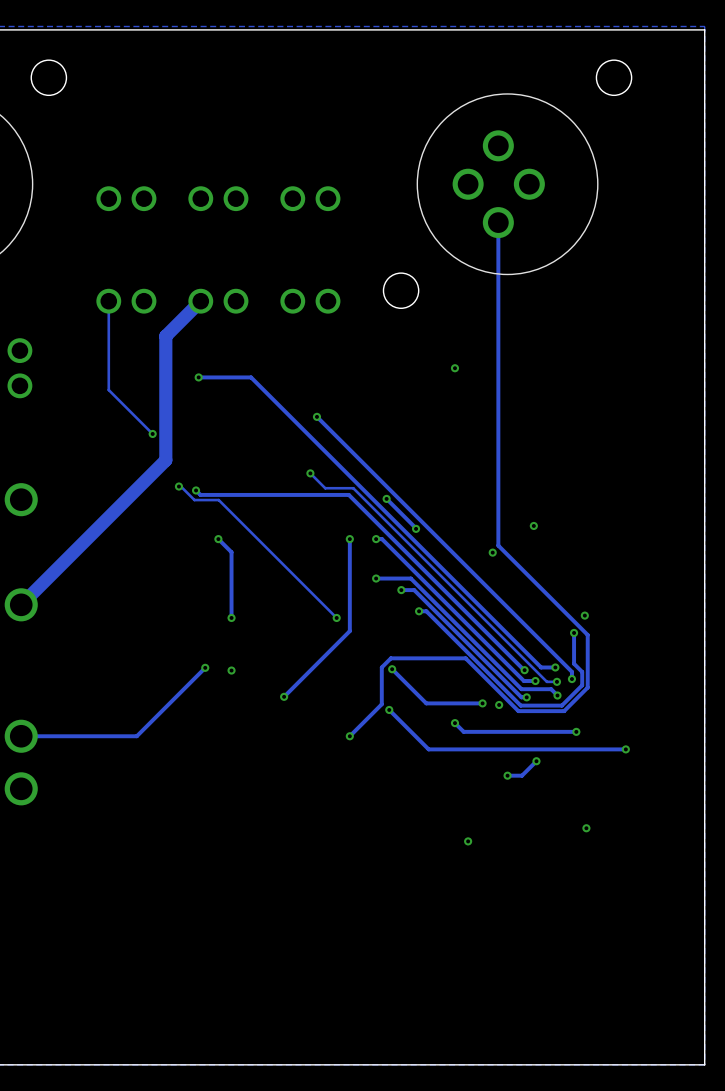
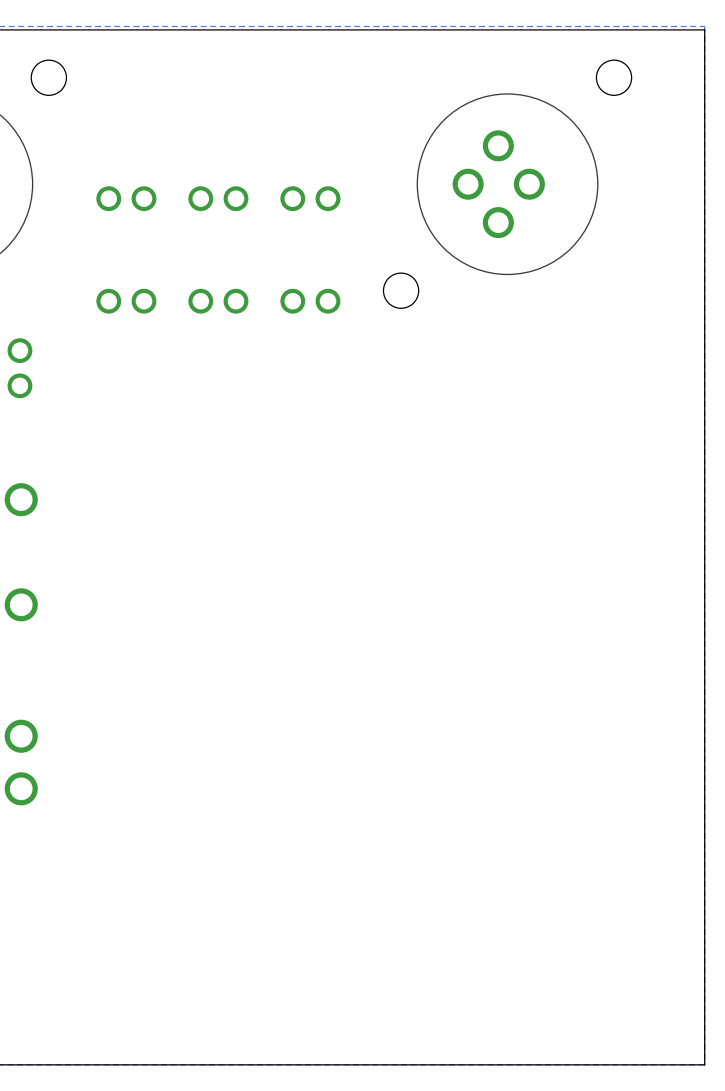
track: (498, 222) (498, 545) (587, 635) (587, 687) (564, 711) (518, 711) (465, 658) (390, 658) (381, 667) (381, 704) (349, 736) -> none
track: (108, 301) (108, 390) (152, 433) -> none
track: (200, 301) (165, 336) (165, 460) (21, 604) -> none
via: (454, 368) -> none
track: (198, 377) (251, 377) (541, 667) (555, 667) -> none
via: (198, 377) -> none
track: (316, 416) (571, 671) (571, 679) -> none
via: (316, 416) -> none
via: (152, 433) -> none
track: (310, 473) (325, 488) (353, 488) (546, 681) (556, 681) -> none
via: (310, 473) -> none
track: (178, 486) (194, 500) (218, 500) (336, 617) -> none
via: (178, 486) -> none
track: (196, 490) (200, 494) (348, 494) (524, 670) -> none
via: (196, 490) -> none
track: (386, 498) (416, 528) -> none
via: (386, 498) -> none
via: (533, 525) -> none
via: (416, 528) -> none
track: (218, 539) (231, 552) (231, 617) -> none
via: (218, 539) -> none
track: (349, 539) (349, 631) (284, 696) -> none
via: (349, 539) -> none
track: (376, 539) (382, 539) (523, 681) (535, 681) -> none
via: (376, 539) -> none
via: (492, 552) -> none
track: (376, 578) (410, 578) (521, 689) (551, 689) (557, 695) -> none
via: (376, 578) -> none
track: (401, 590) (414, 590) (521, 697) (526, 697) -> none
via: (401, 590) -> none
track: (419, 611) (426, 611) (520, 705) (561, 705) (582, 685) (582, 671) (574, 663) (574, 632) -> none
via: (419, 611) -> none
via: (584, 615) -> none
via: (231, 617) -> none
via: (336, 617) -> none
via: (574, 632) -> none
track: (205, 667) (136, 736) (21, 736) -> none
via: (205, 667) -> none
via: (555, 667) -> none
track: (392, 669) (426, 703) (482, 703) -> none
via: (392, 669) -> none
via: (231, 670) -> none
via: (524, 670) -> none
via: (571, 679) -> none
via: (535, 681) -> none
via: (556, 681) -> none
via: (557, 695) -> none
via: (284, 696) -> none
via: (526, 697) -> none
via: (482, 703) -> none
via: (499, 704) -> none
track: (389, 709) (428, 749) (625, 749) -> none
via: (389, 709) -> none
track: (454, 723) (463, 731) (576, 731) -> none
via: (454, 723) -> none
via: (576, 731) -> none
via: (349, 736) -> none
via: (625, 749) -> none
track: (536, 761) (522, 775) (507, 775) -> none
via: (536, 761) -> none
via: (507, 775) -> none
via: (586, 828) -> none
via: (468, 841) -> none

